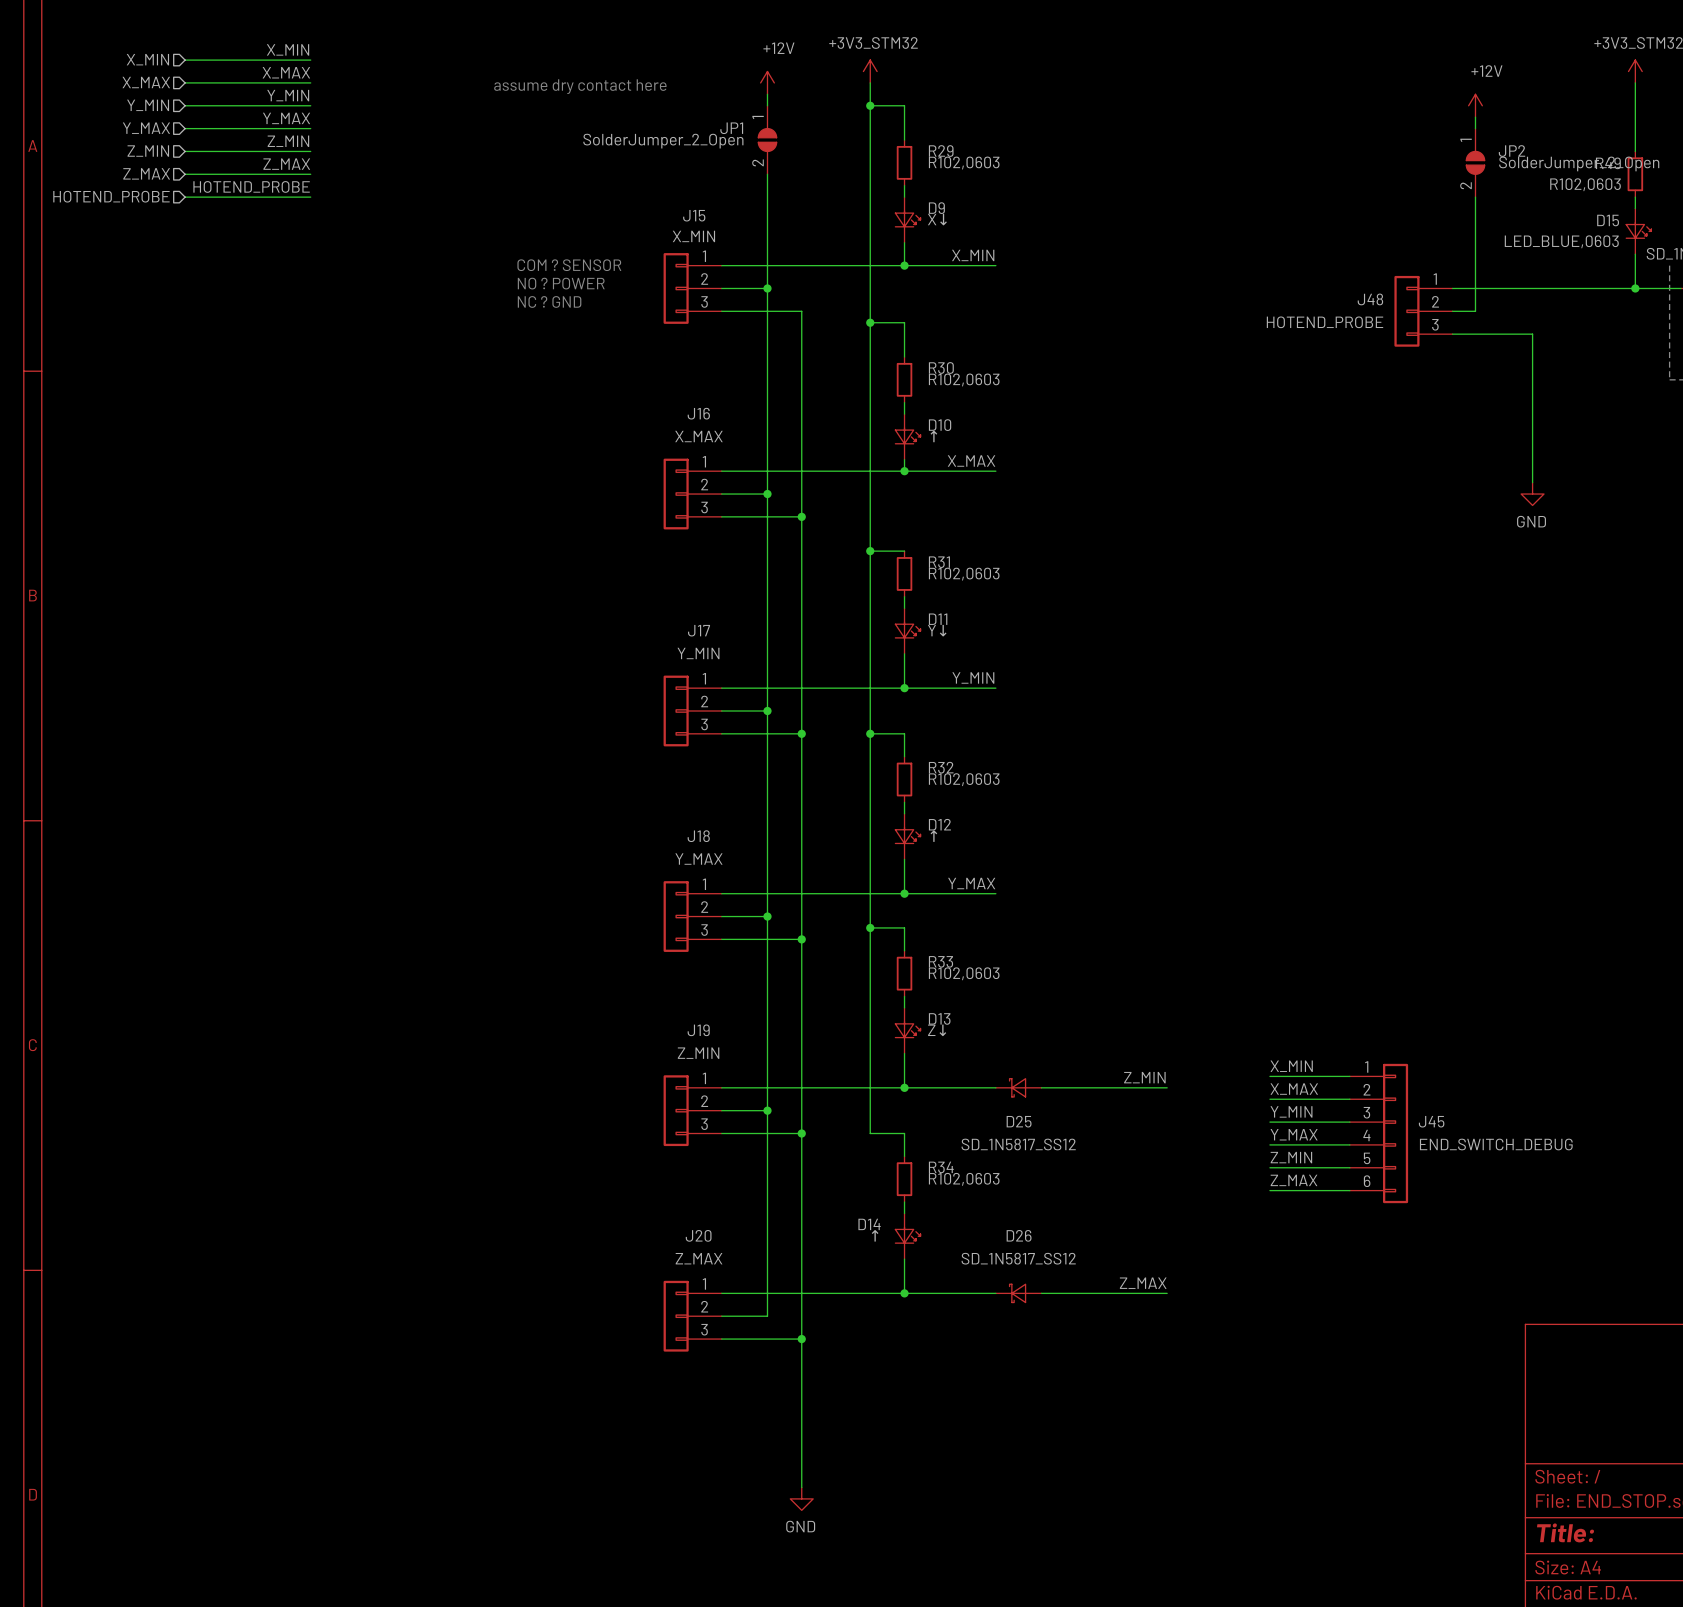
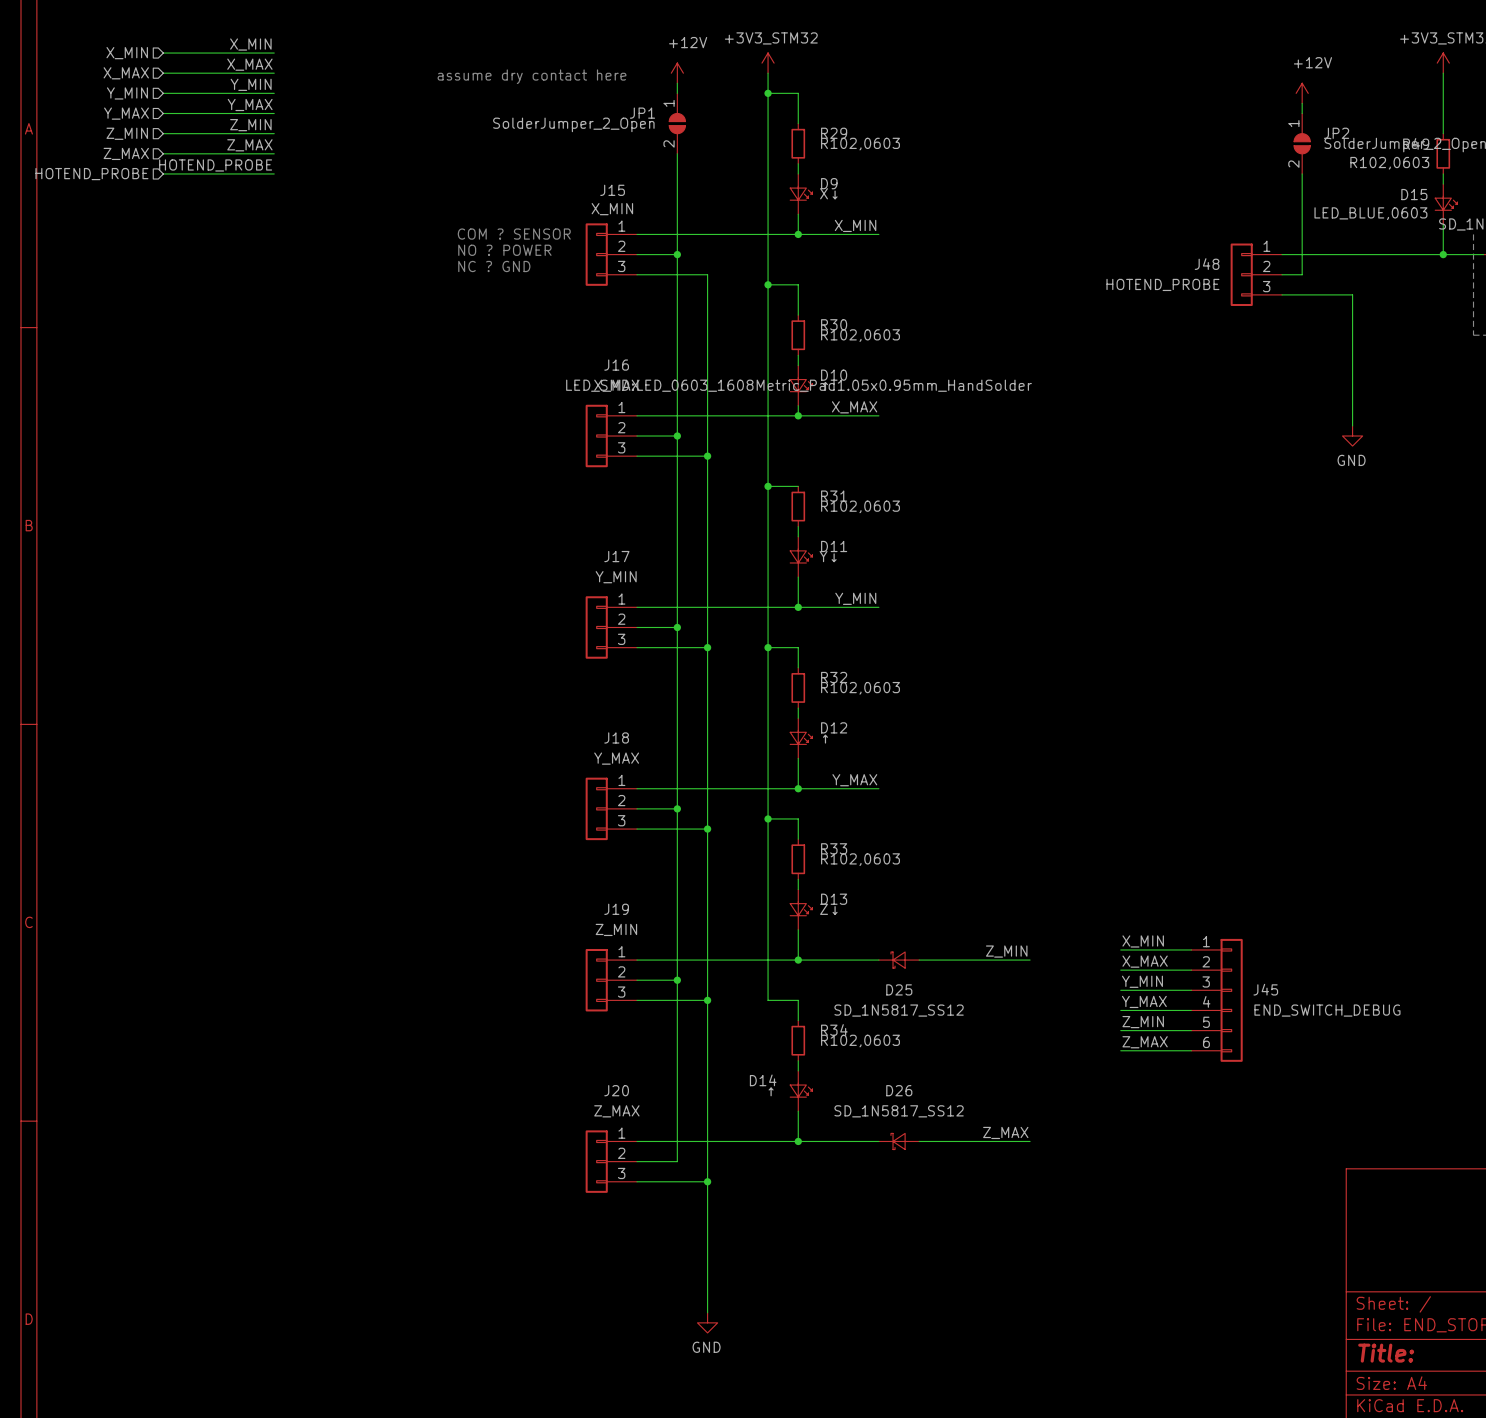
D10 text: none -> LED_SMD:LED_0603_1608Metric_Pad1.05x0.95mm_HandSolder (799, 385)

